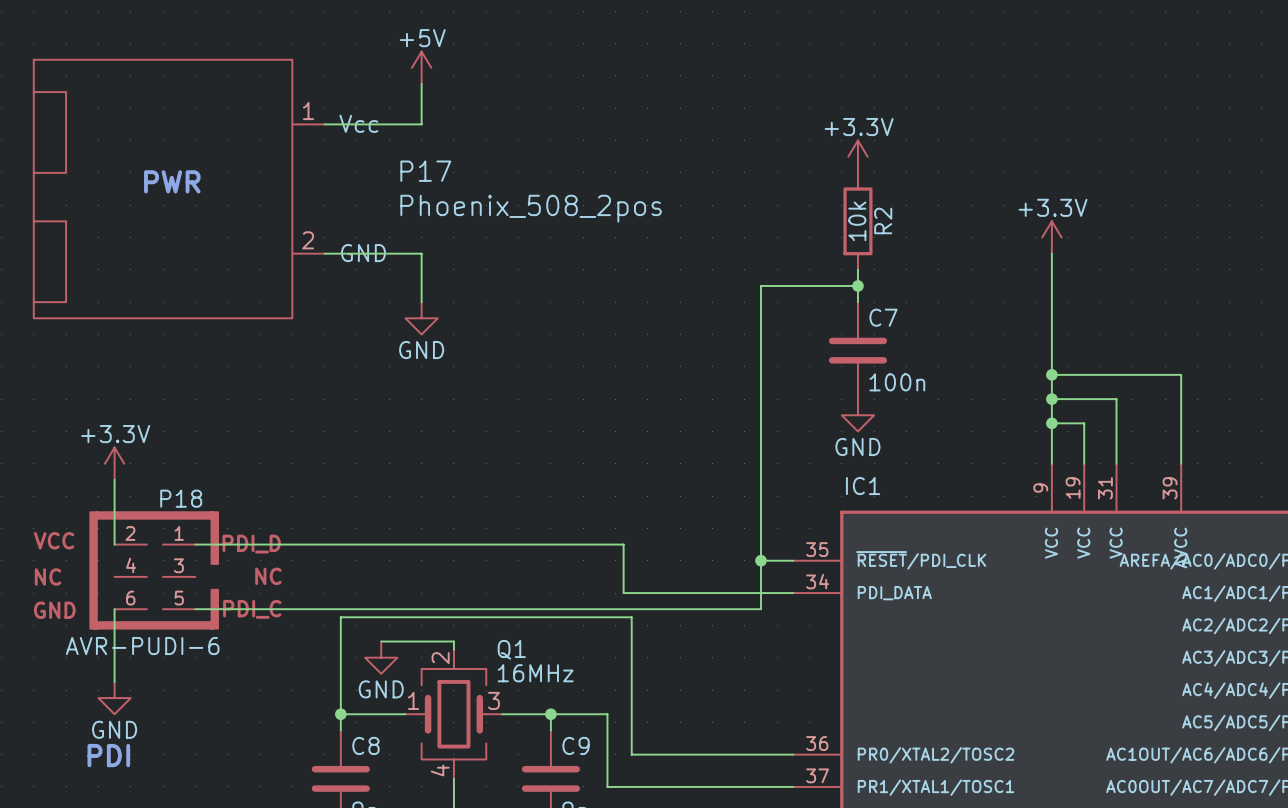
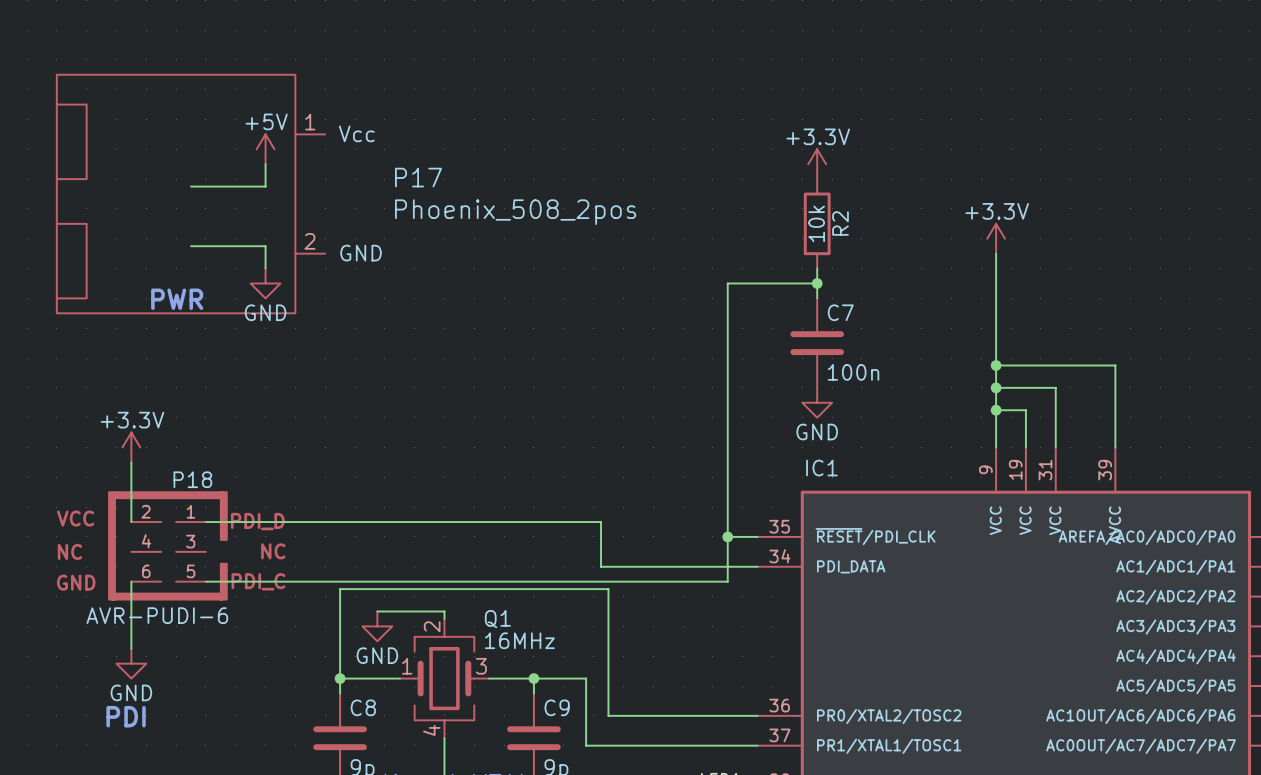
power symbol position: +5V (421, 67) -> +5V (265, 149)
wire: (421, 83) (421, 124) (324, 124) -> none
wire: none -> (265, 164) (265, 186) (191, 186)
text position: PWR (172, 181) -> PWR (177, 299)
wire: none -> (191, 246) (265, 246) (265, 268)
wire: (324, 253) (421, 253) (421, 302) -> none
power symbol position: GND (421, 318) -> GND (265, 283)

